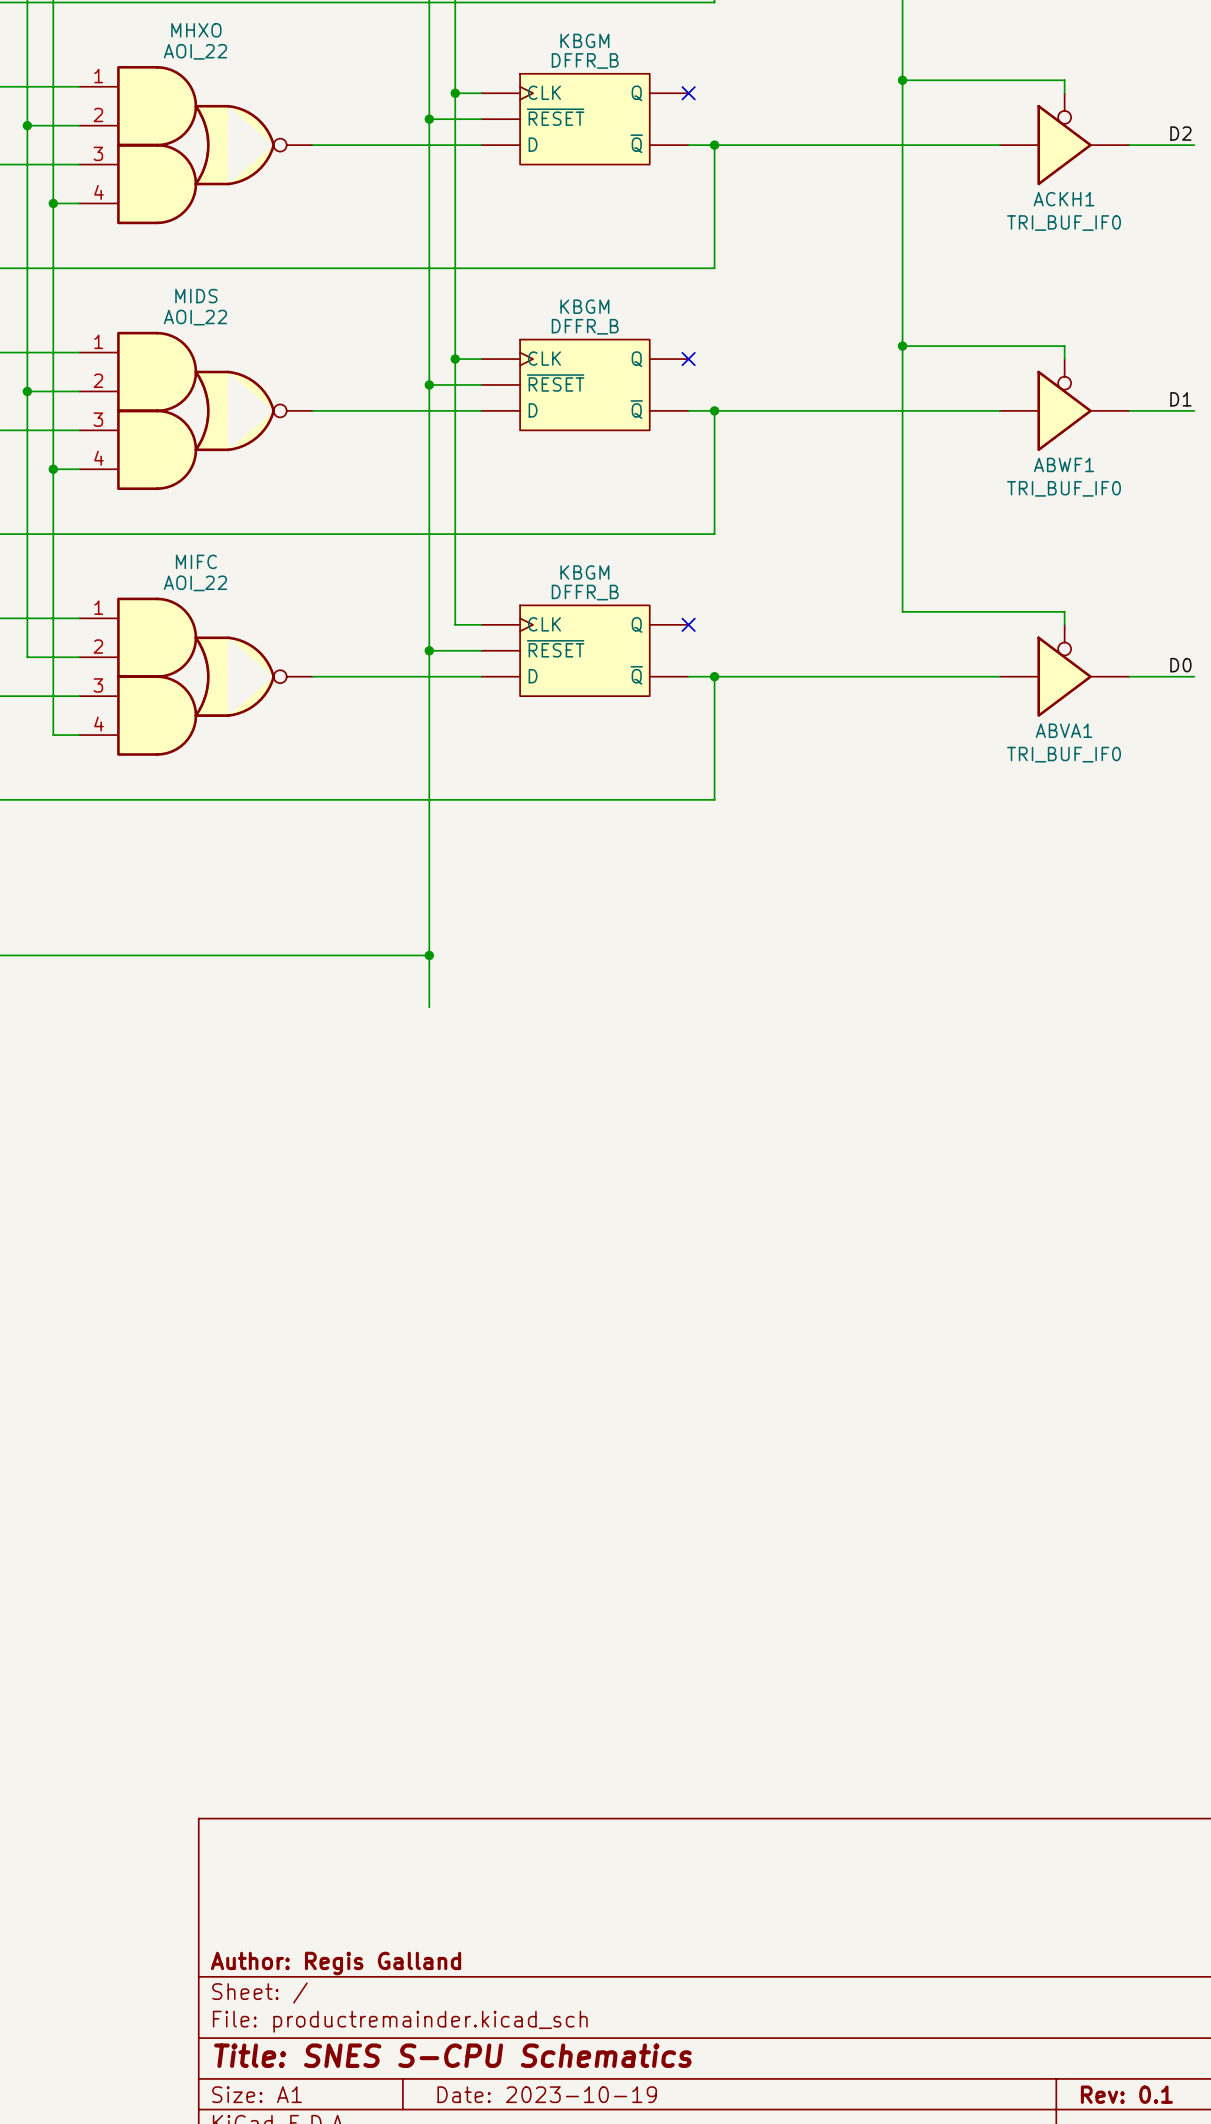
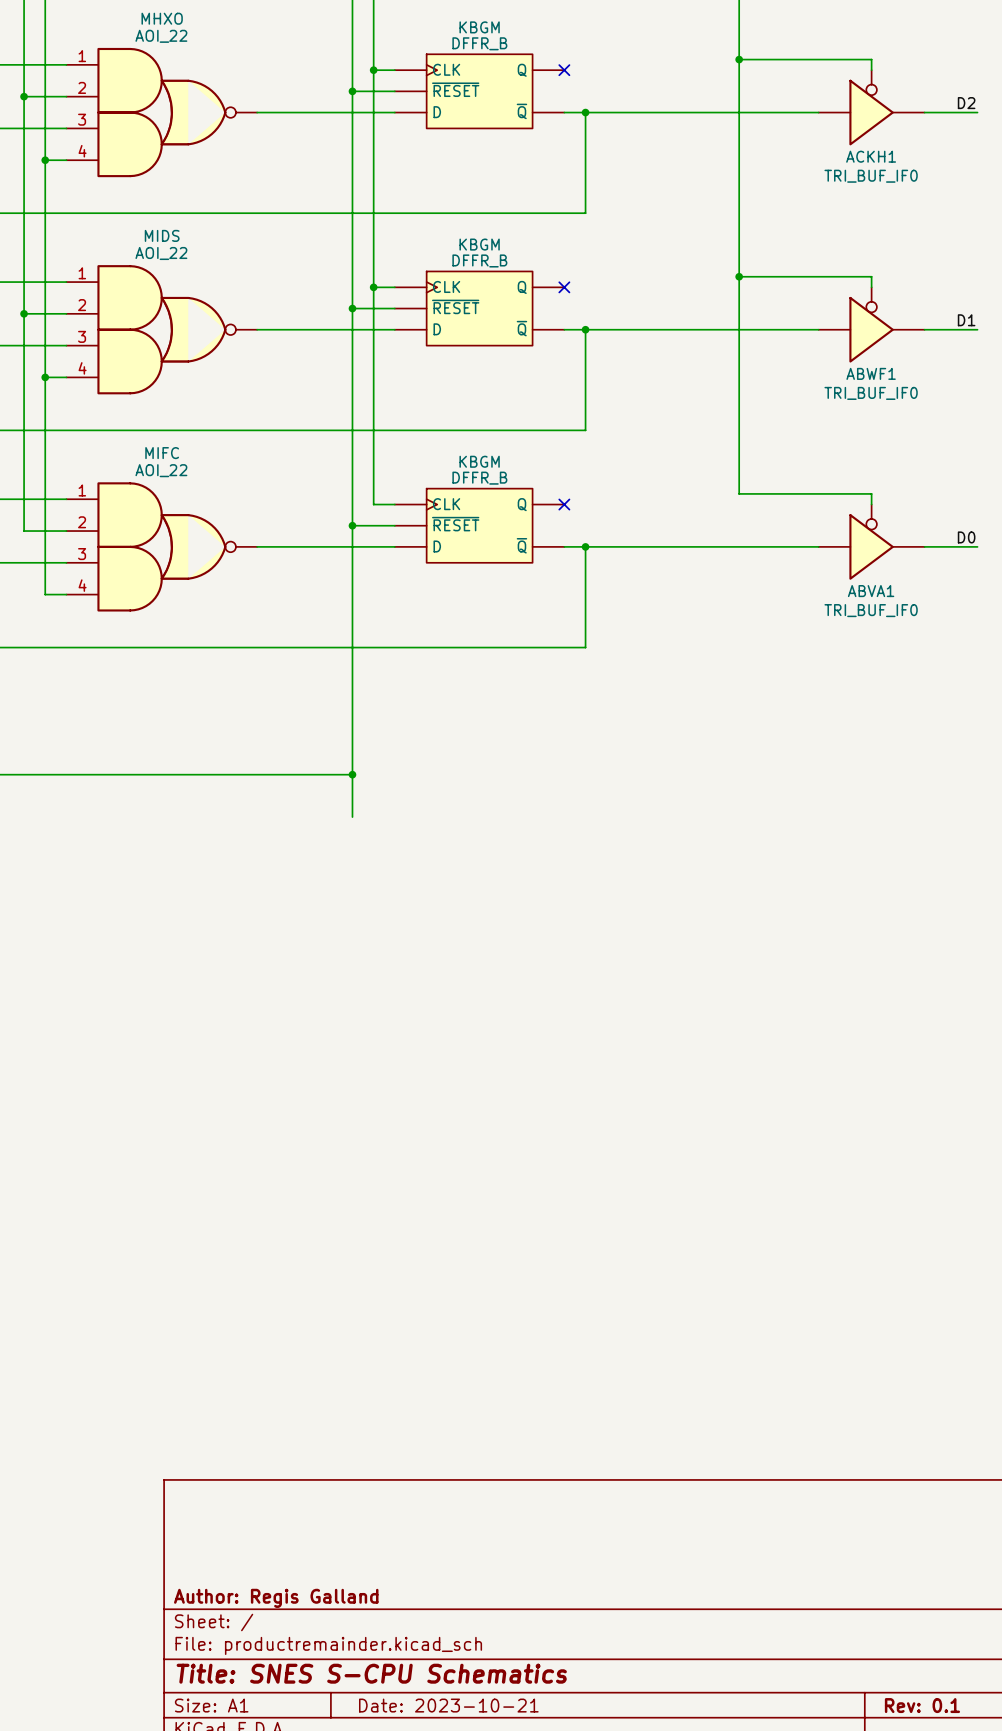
title block: Date: 2023-10-19 (547, 2094) -> Date: 2023-10-21 (448, 1705)

